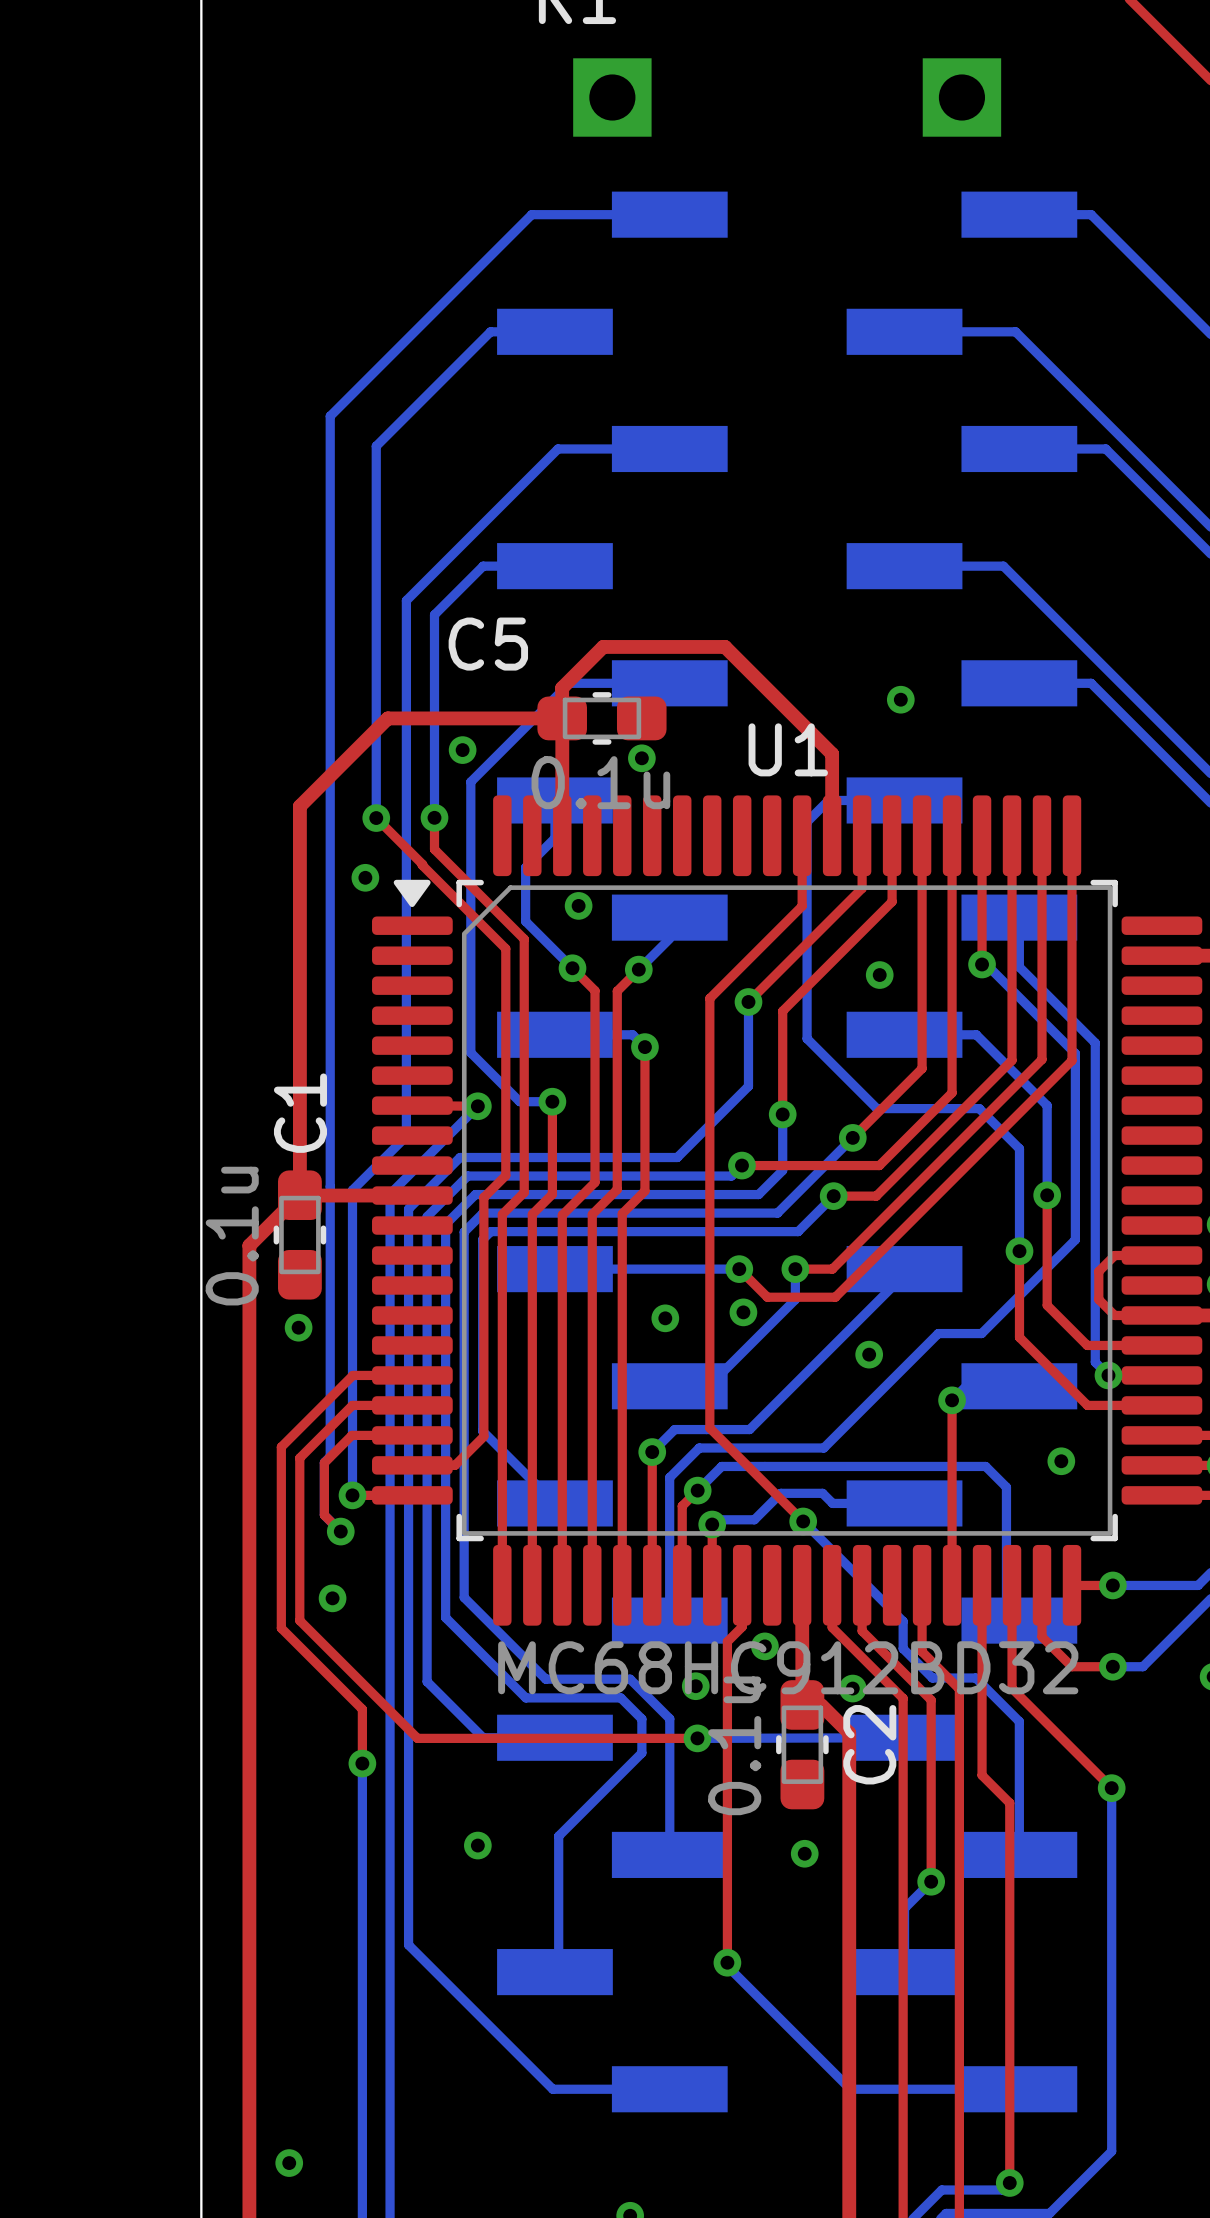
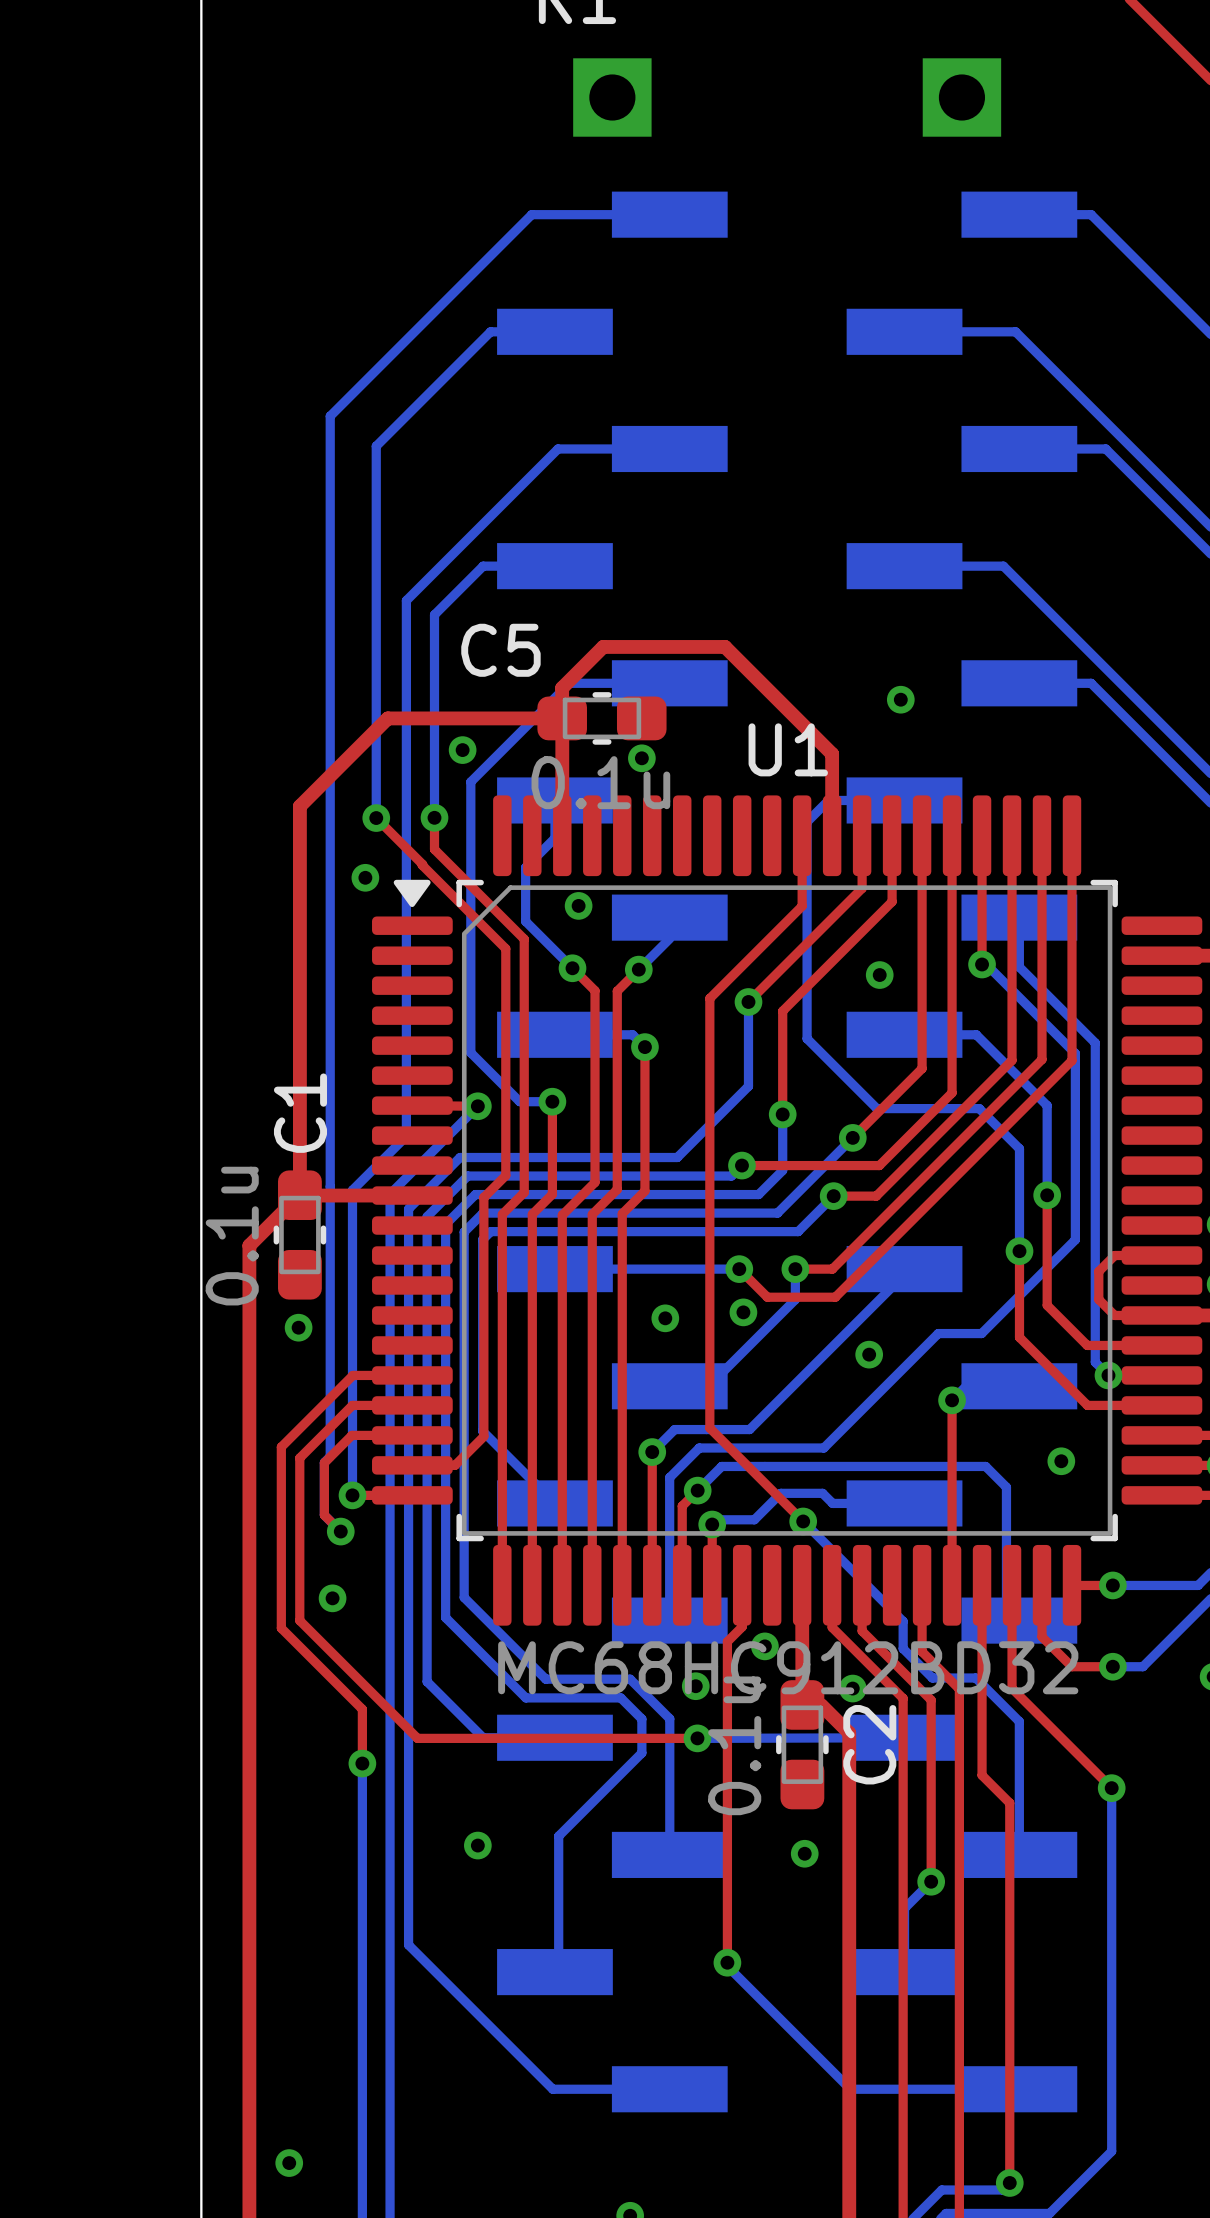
C5 name position: C5 (488, 644) -> C5 (500, 650)

